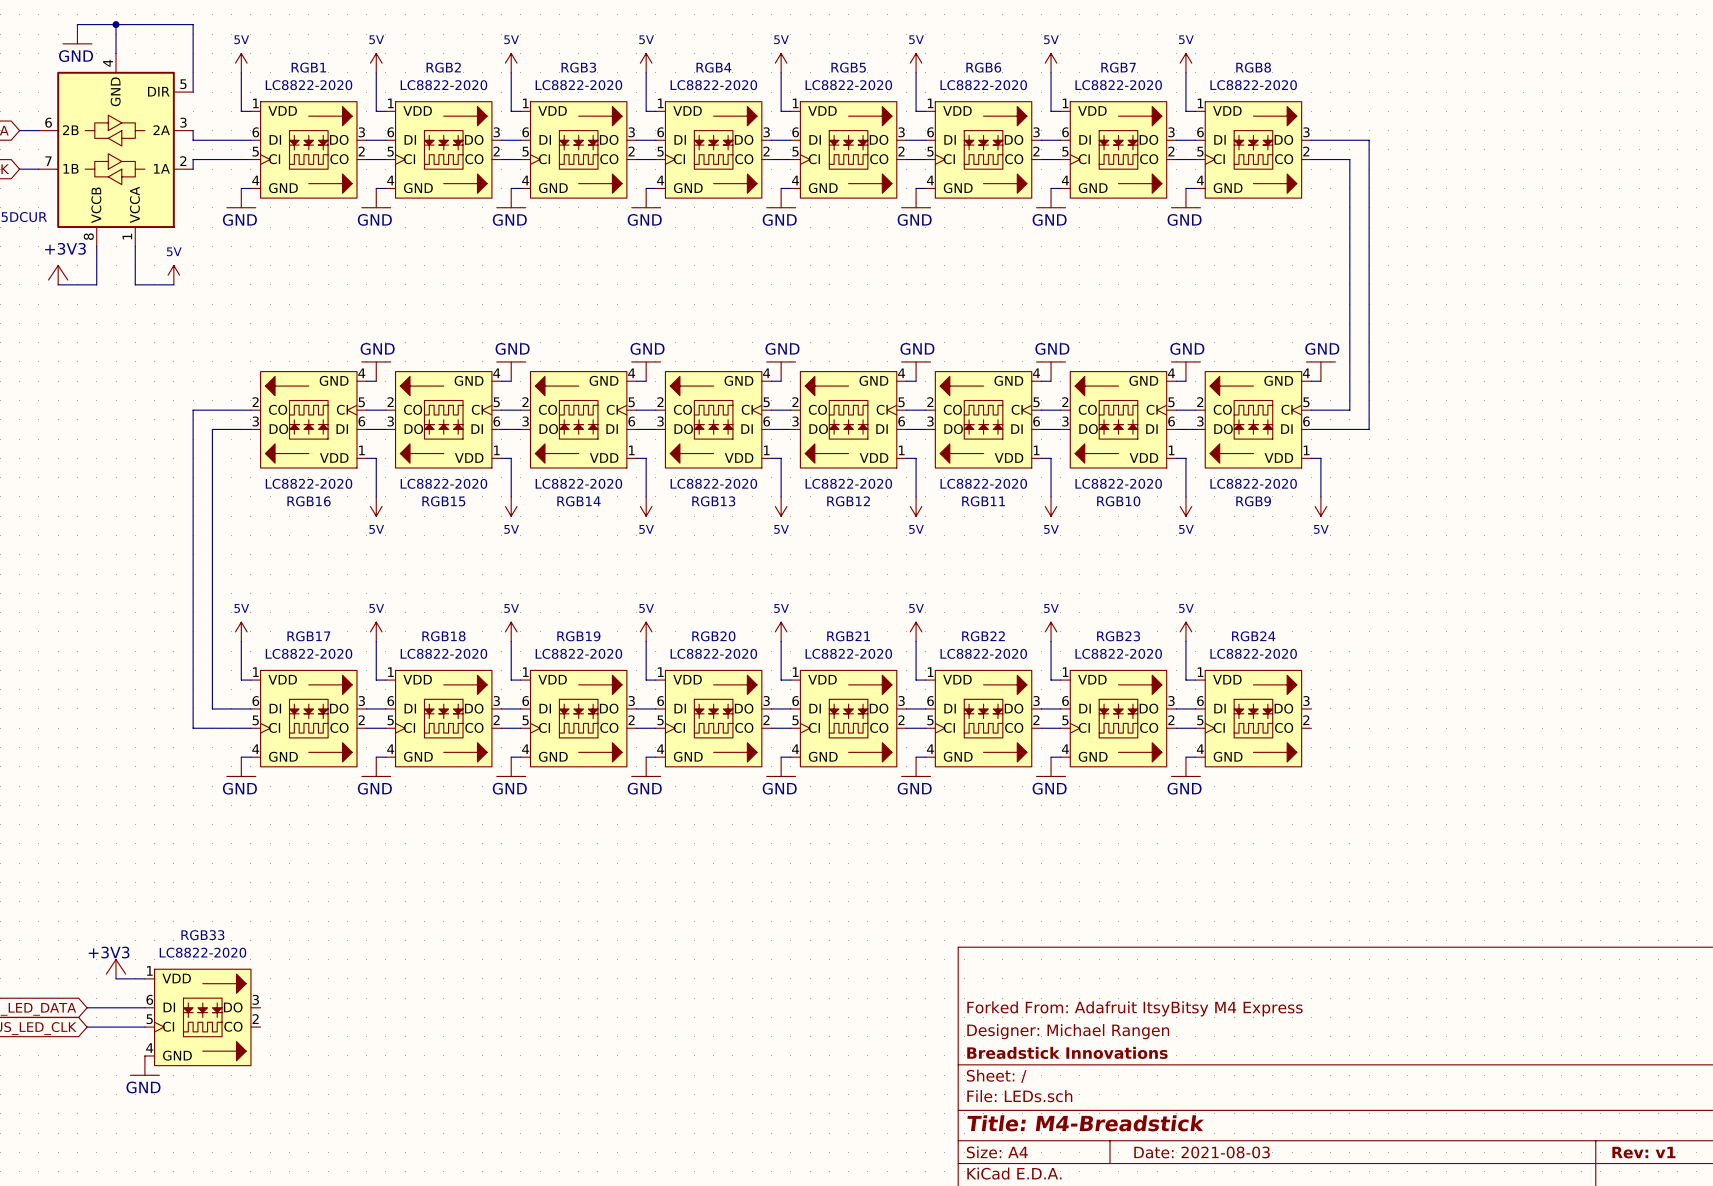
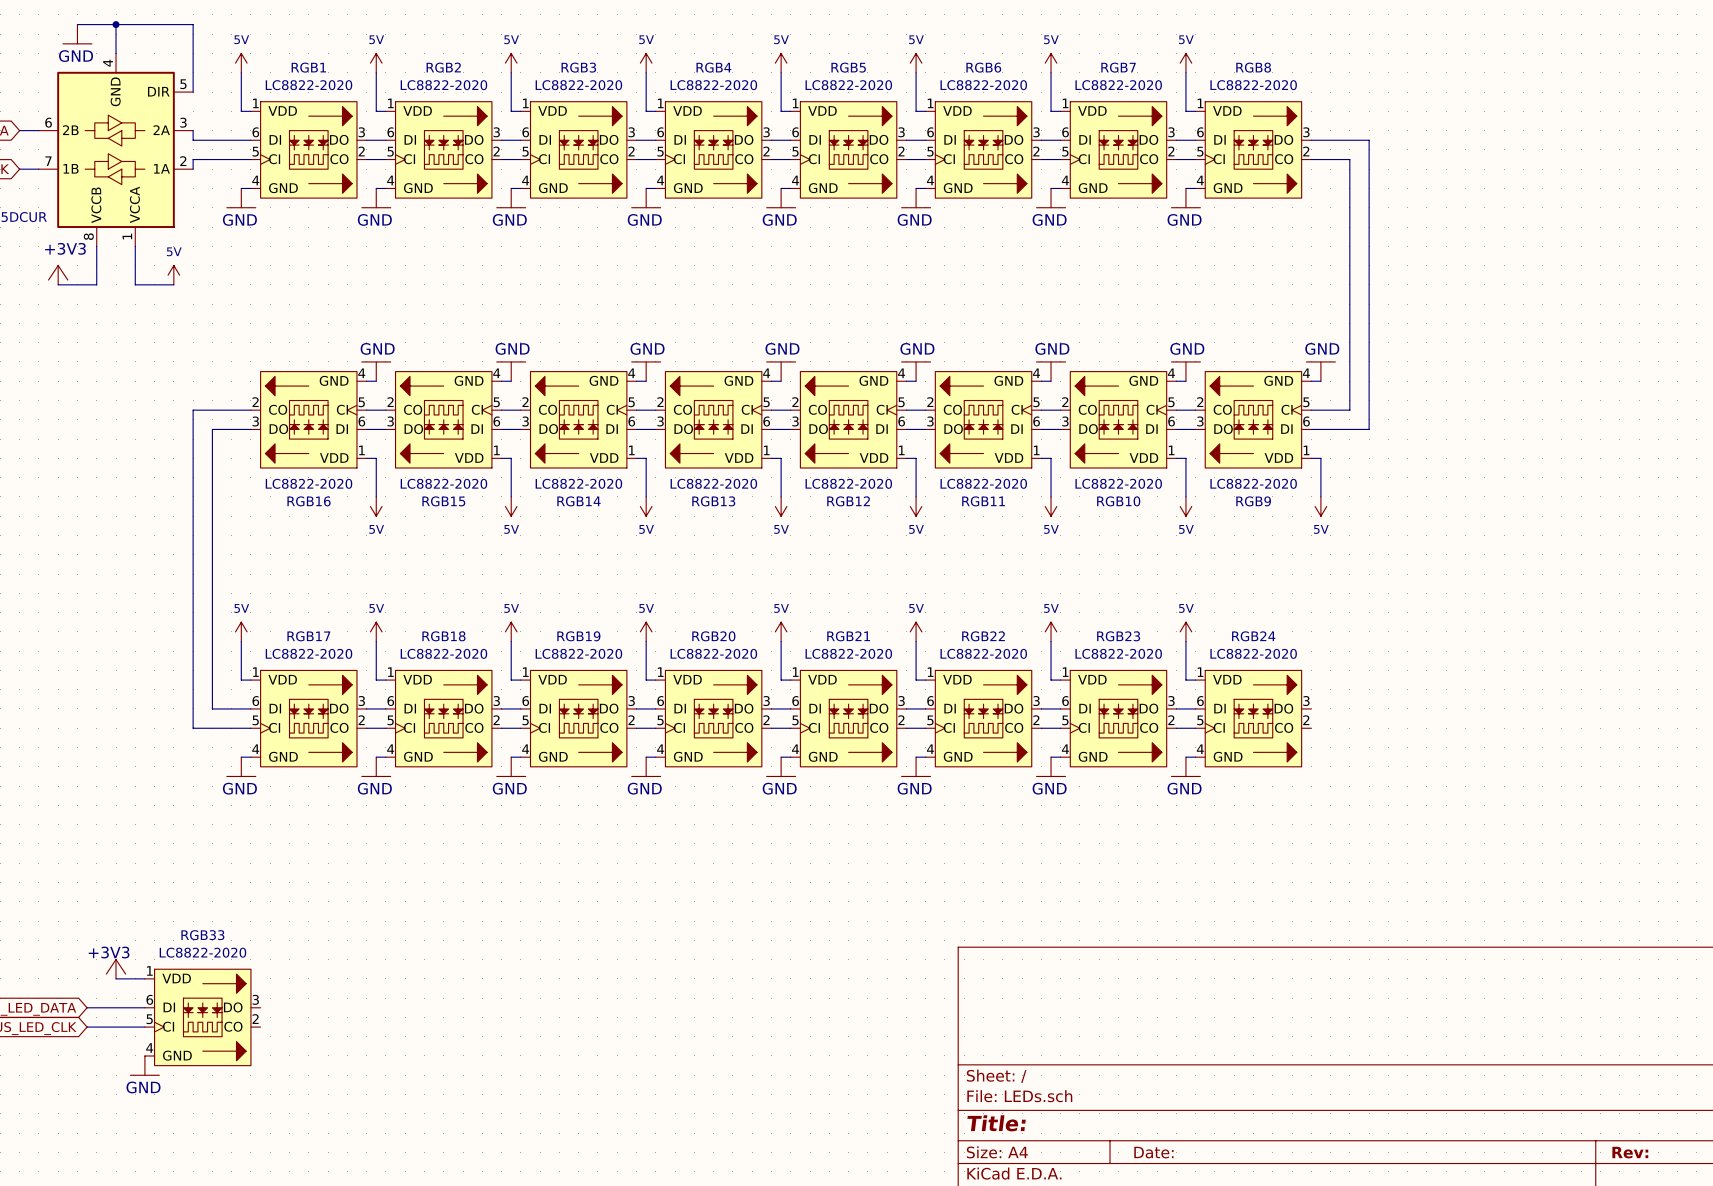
title block: Forked From: Adafruit ItsyBitsy M4 Express (1134, 1008) -> none
title block: Designer: Michael Rangen (1068, 1031) -> none
title block: Breadstick Innovations (1067, 1052) -> none
title block: Title: M4-Breadstick (1085, 1123) -> Title: (996, 1123)
title block: Date: 2021-08-03 (1202, 1152) -> Date: (1153, 1152)
title block: Rev: v1 (1643, 1152) -> Rev: (1630, 1152)

